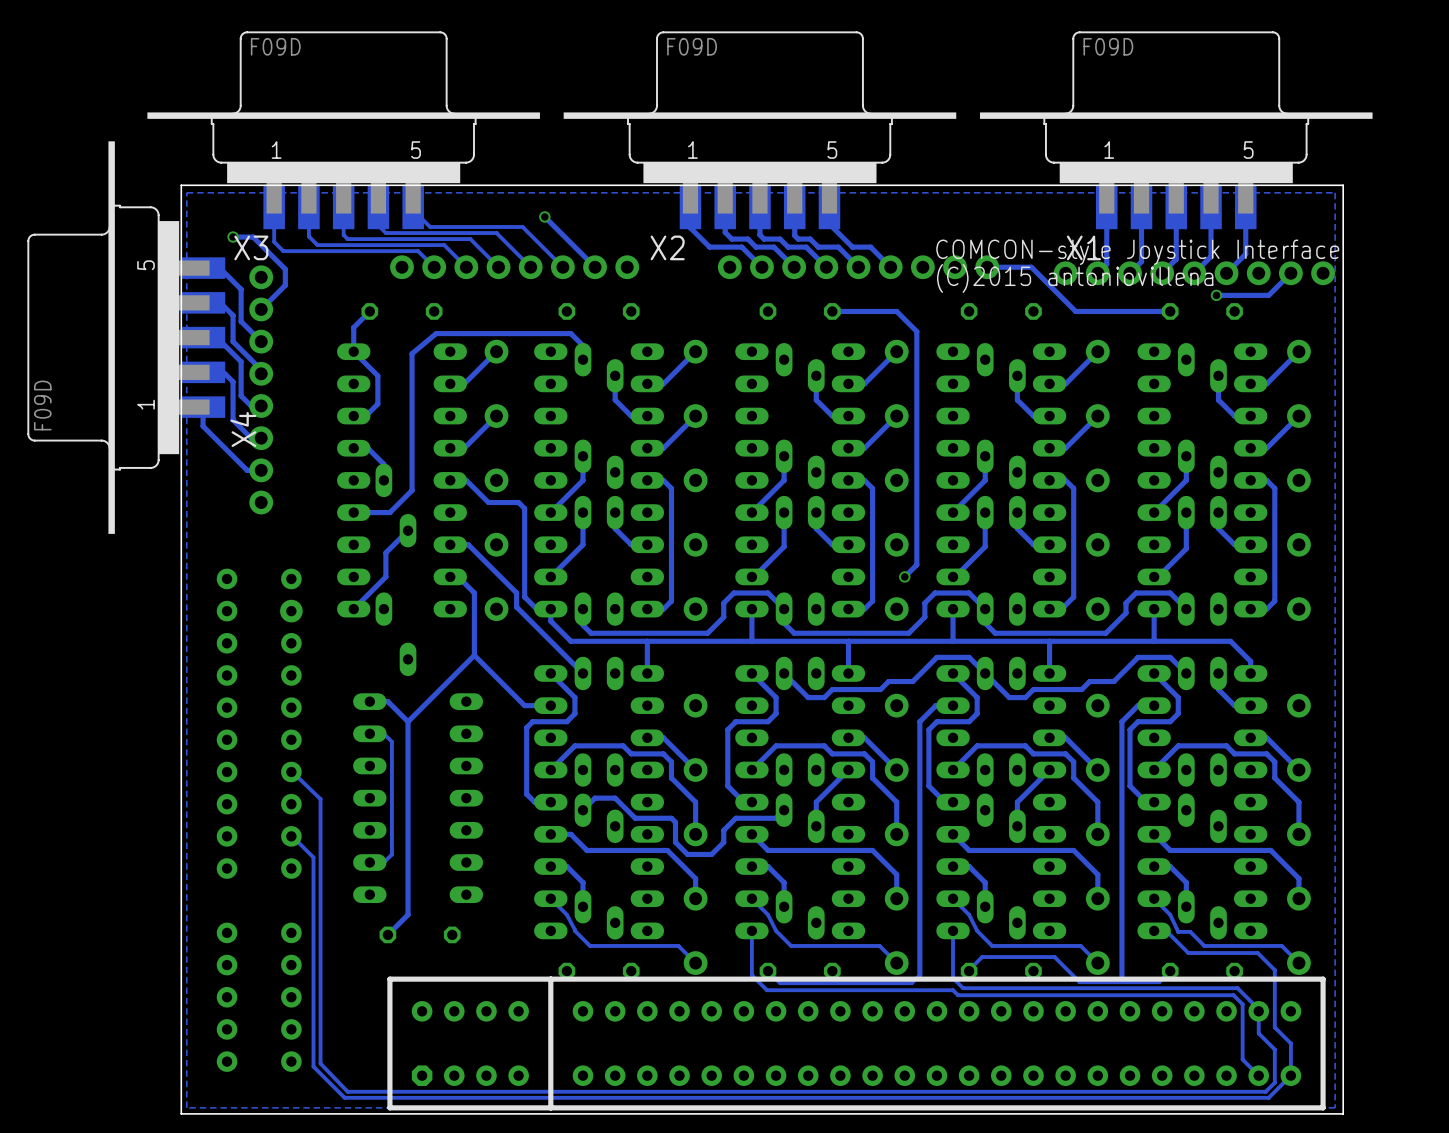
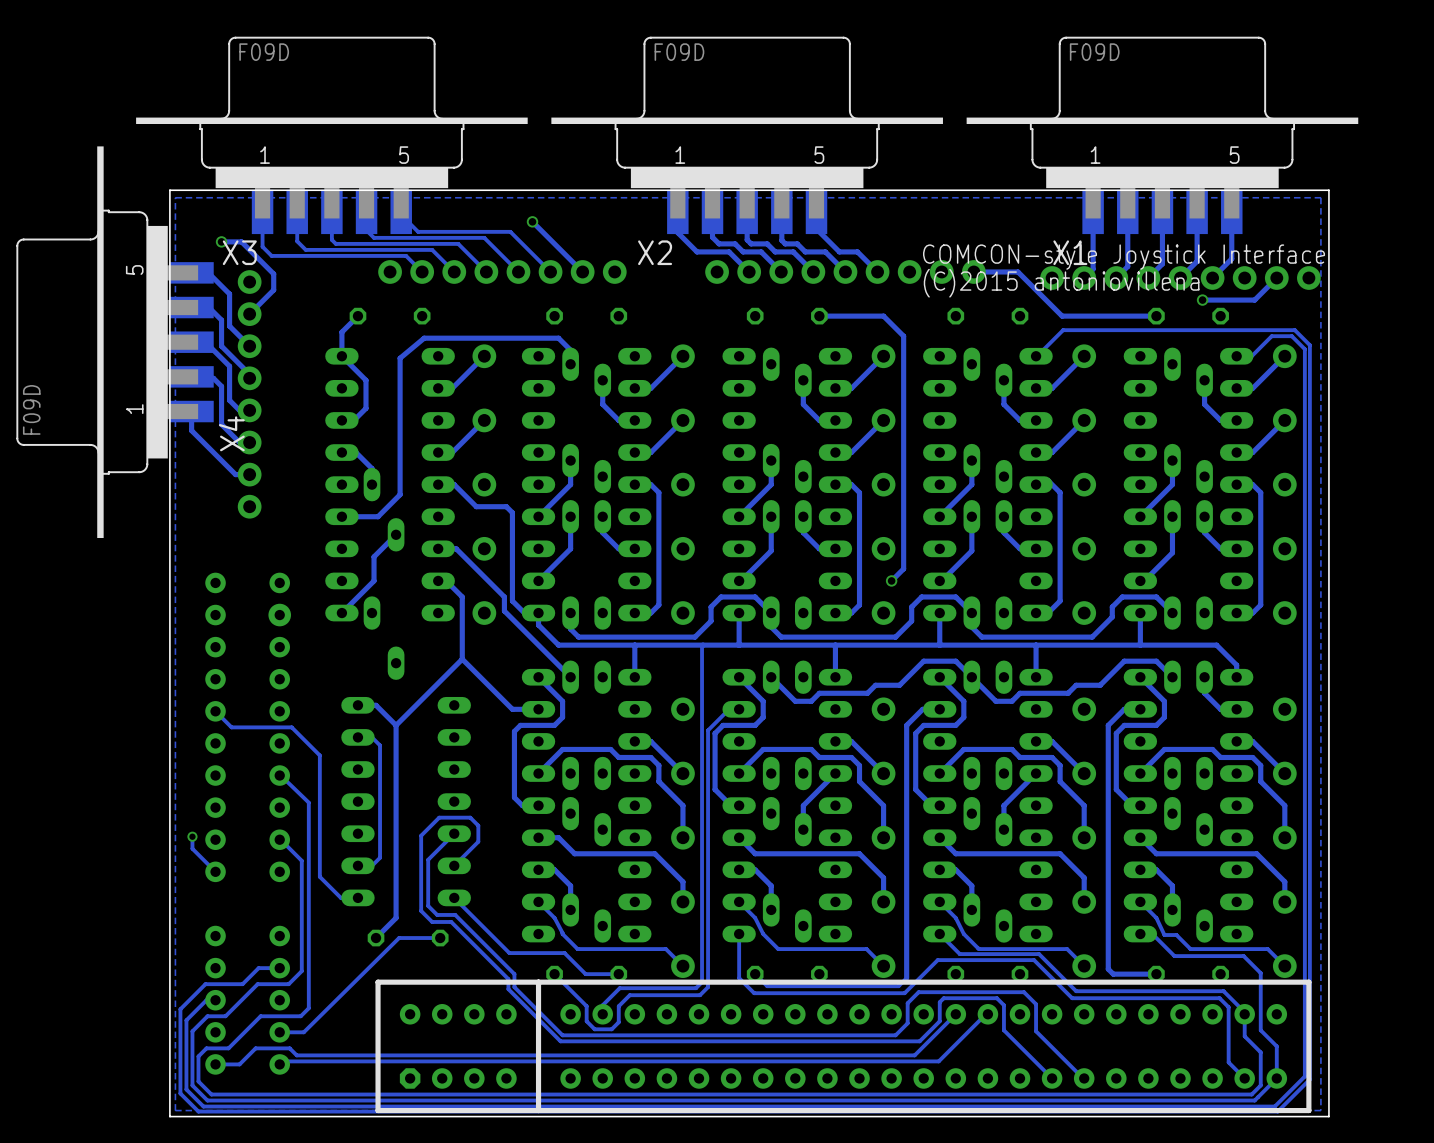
track: none -> (1036, 356) (1063, 330) (1294, 330) (1309, 345) (1309, 1079) (1277, 1111) (198, 1111) (180, 1093) (180, 1009) (205, 984) (242, 984) (258, 968) (279, 968)
track: none -> (1236, 356) (1251, 356) (1271, 336) (1291, 336) (1304, 349) (1304, 1076) (1274, 1106) (203, 1106) (186, 1089) (186, 1020) (206, 1000) (215, 1000)
track: none -> (703, 645) (702, 982) (696, 988) (619, 988) (602, 1005) (602, 1014)
track: none -> (739, 709) (729, 709) (708, 730) (708, 987) (700, 995) (629, 995) (618, 1006) (618, 1022) (611, 1029) (594, 1029) (586, 1021) (586, 1006) (554, 974)
track: none -> (215, 711) (231, 727) (291, 727) (319, 755) (319, 876) (340, 897) (357, 897)
track: (784, 810) (776, 818) (735, 818) (723, 830) (723, 842) (711, 854) (687, 854) (675, 842) (675, 822) (671, 818) (635, 818) (615, 798) (595, 798) (582, 810) -> none
track: none -> (454, 833) (428, 859) (428, 905) (437, 914) (455, 914) (514, 974) (514, 987) (562, 1035) (895, 1035) (907, 1023) (907, 1003) (918, 992) (1024, 992) (1036, 1004) (1036, 1031) (1084, 1078)
track: none -> (192, 836) (192, 848) (215, 871)
via: none -> (192, 836)
track: none -> (454, 865) (478, 841) (478, 825) (470, 817) (439, 817) (421, 835) (421, 910) (432, 921) (451, 921) (508, 979) (508, 989) (560, 1041) (919, 1041) (939, 1021) (939, 1002) (944, 998)
track: none -> (454, 897) (509, 953) (564, 953) (585, 974) (618, 974)
track: (953, 930) (953, 979) (963, 988) (1089, 988) -> (939, 934) (959, 954) (1039, 954) (1076, 991)
track: none -> (440, 938) (399, 938) (303, 1032) (279, 1032)
track: (982, 957) (969, 971) -> none
track: (1047, 957) (1054, 957) (1079, 982) (1159, 982) (1170, 971) -> none
track: (1121, 966) (1122, 982) -> (1108, 969) (1113, 974) (1156, 974)
track: (313, 968) (313, 1066) (344, 1097) -> (301, 971) (288, 984) (257, 984) (225, 1016) (207, 1016) (192, 1031) (192, 1085) (207, 1100) (332, 1100)
track: (917, 990) (953, 990) (958, 995) -> (904, 993) (937, 960) (968, 960)
track: none -> (996, 998) (1003, 1005) (1003, 1030) (1052, 1078)
track: (1085, 995) (1010, 995) -> (1072, 998) (1034, 960)
track: (320, 1005) (320, 1063) (347, 1091) -> (308, 1008) (300, 1016) (260, 1016) (228, 1048) (206, 1048) (198, 1056) (198, 1081) (211, 1094) (335, 1094)
track: none -> (955, 1014) (914, 1055) (296, 1055) (289, 1048) (255, 1048) (239, 1064) (215, 1064)
track: none -> (987, 1014) (938, 1061) (282, 1061) (279, 1064)

